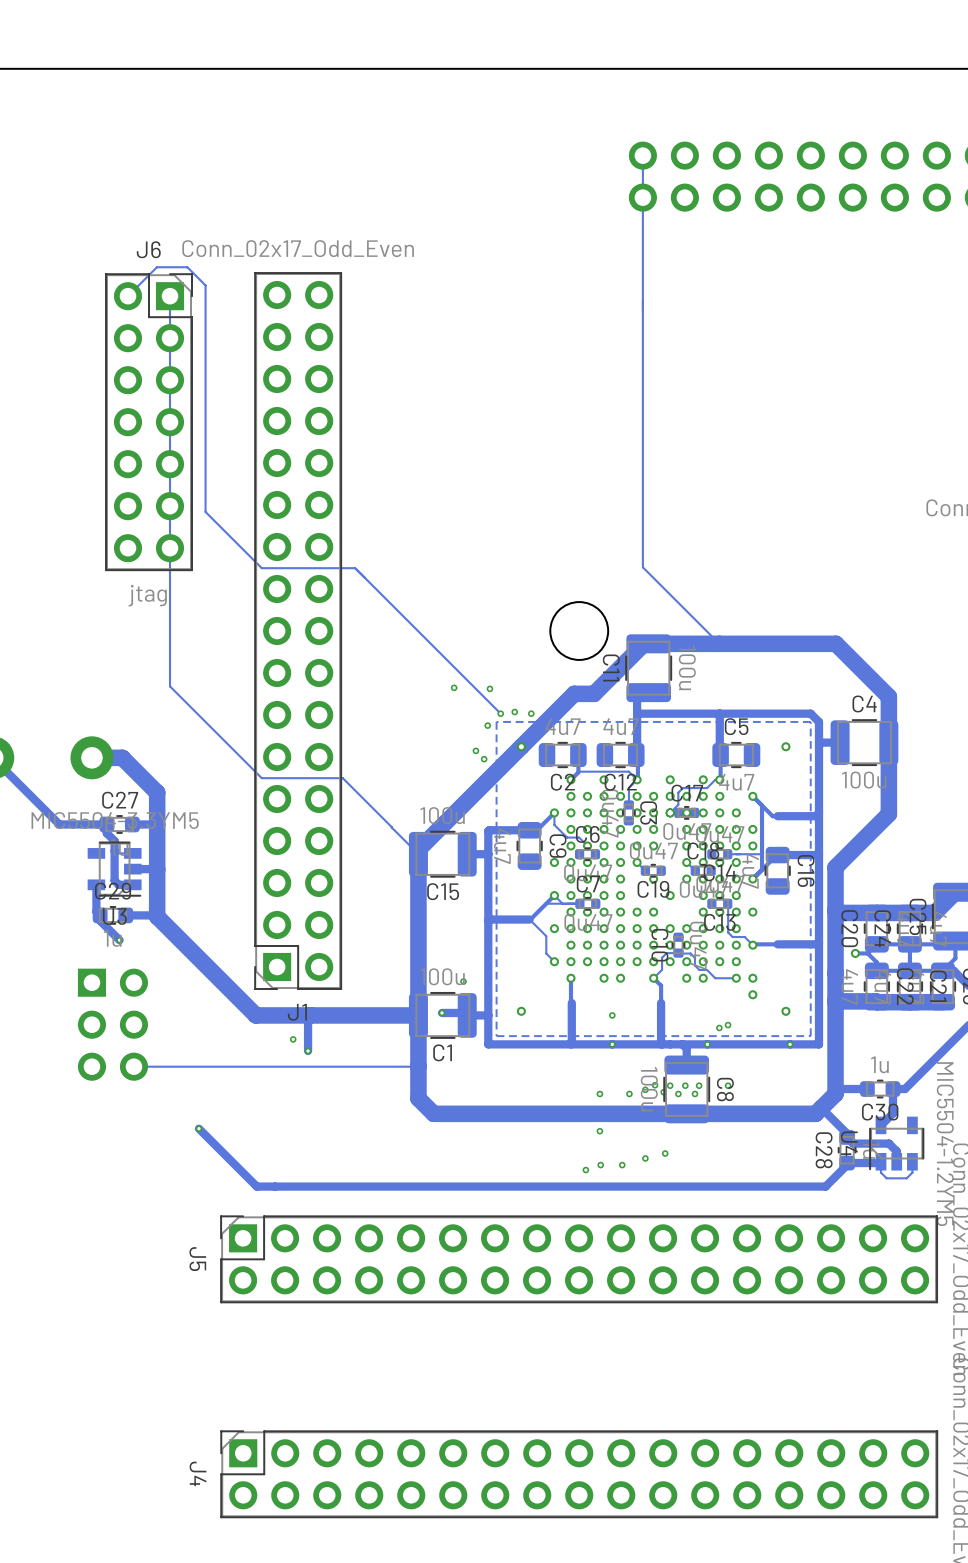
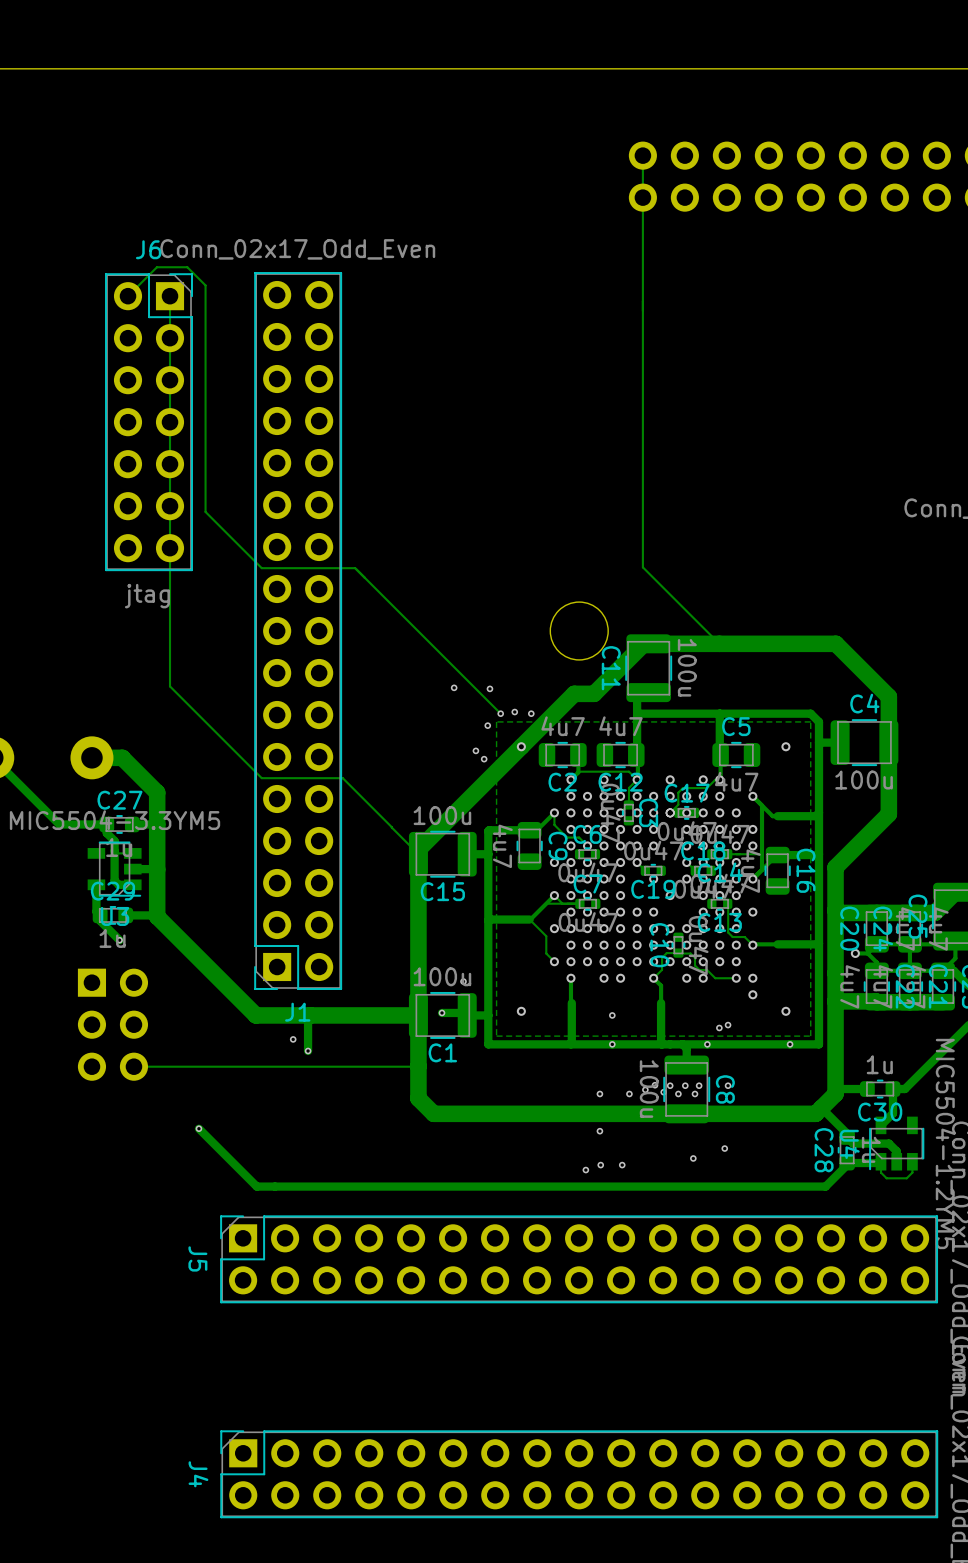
via: none -> (724, 1148)
via: (665, 1153) -> none
via: (645, 1158) -> none
via: none -> (693, 1158)

